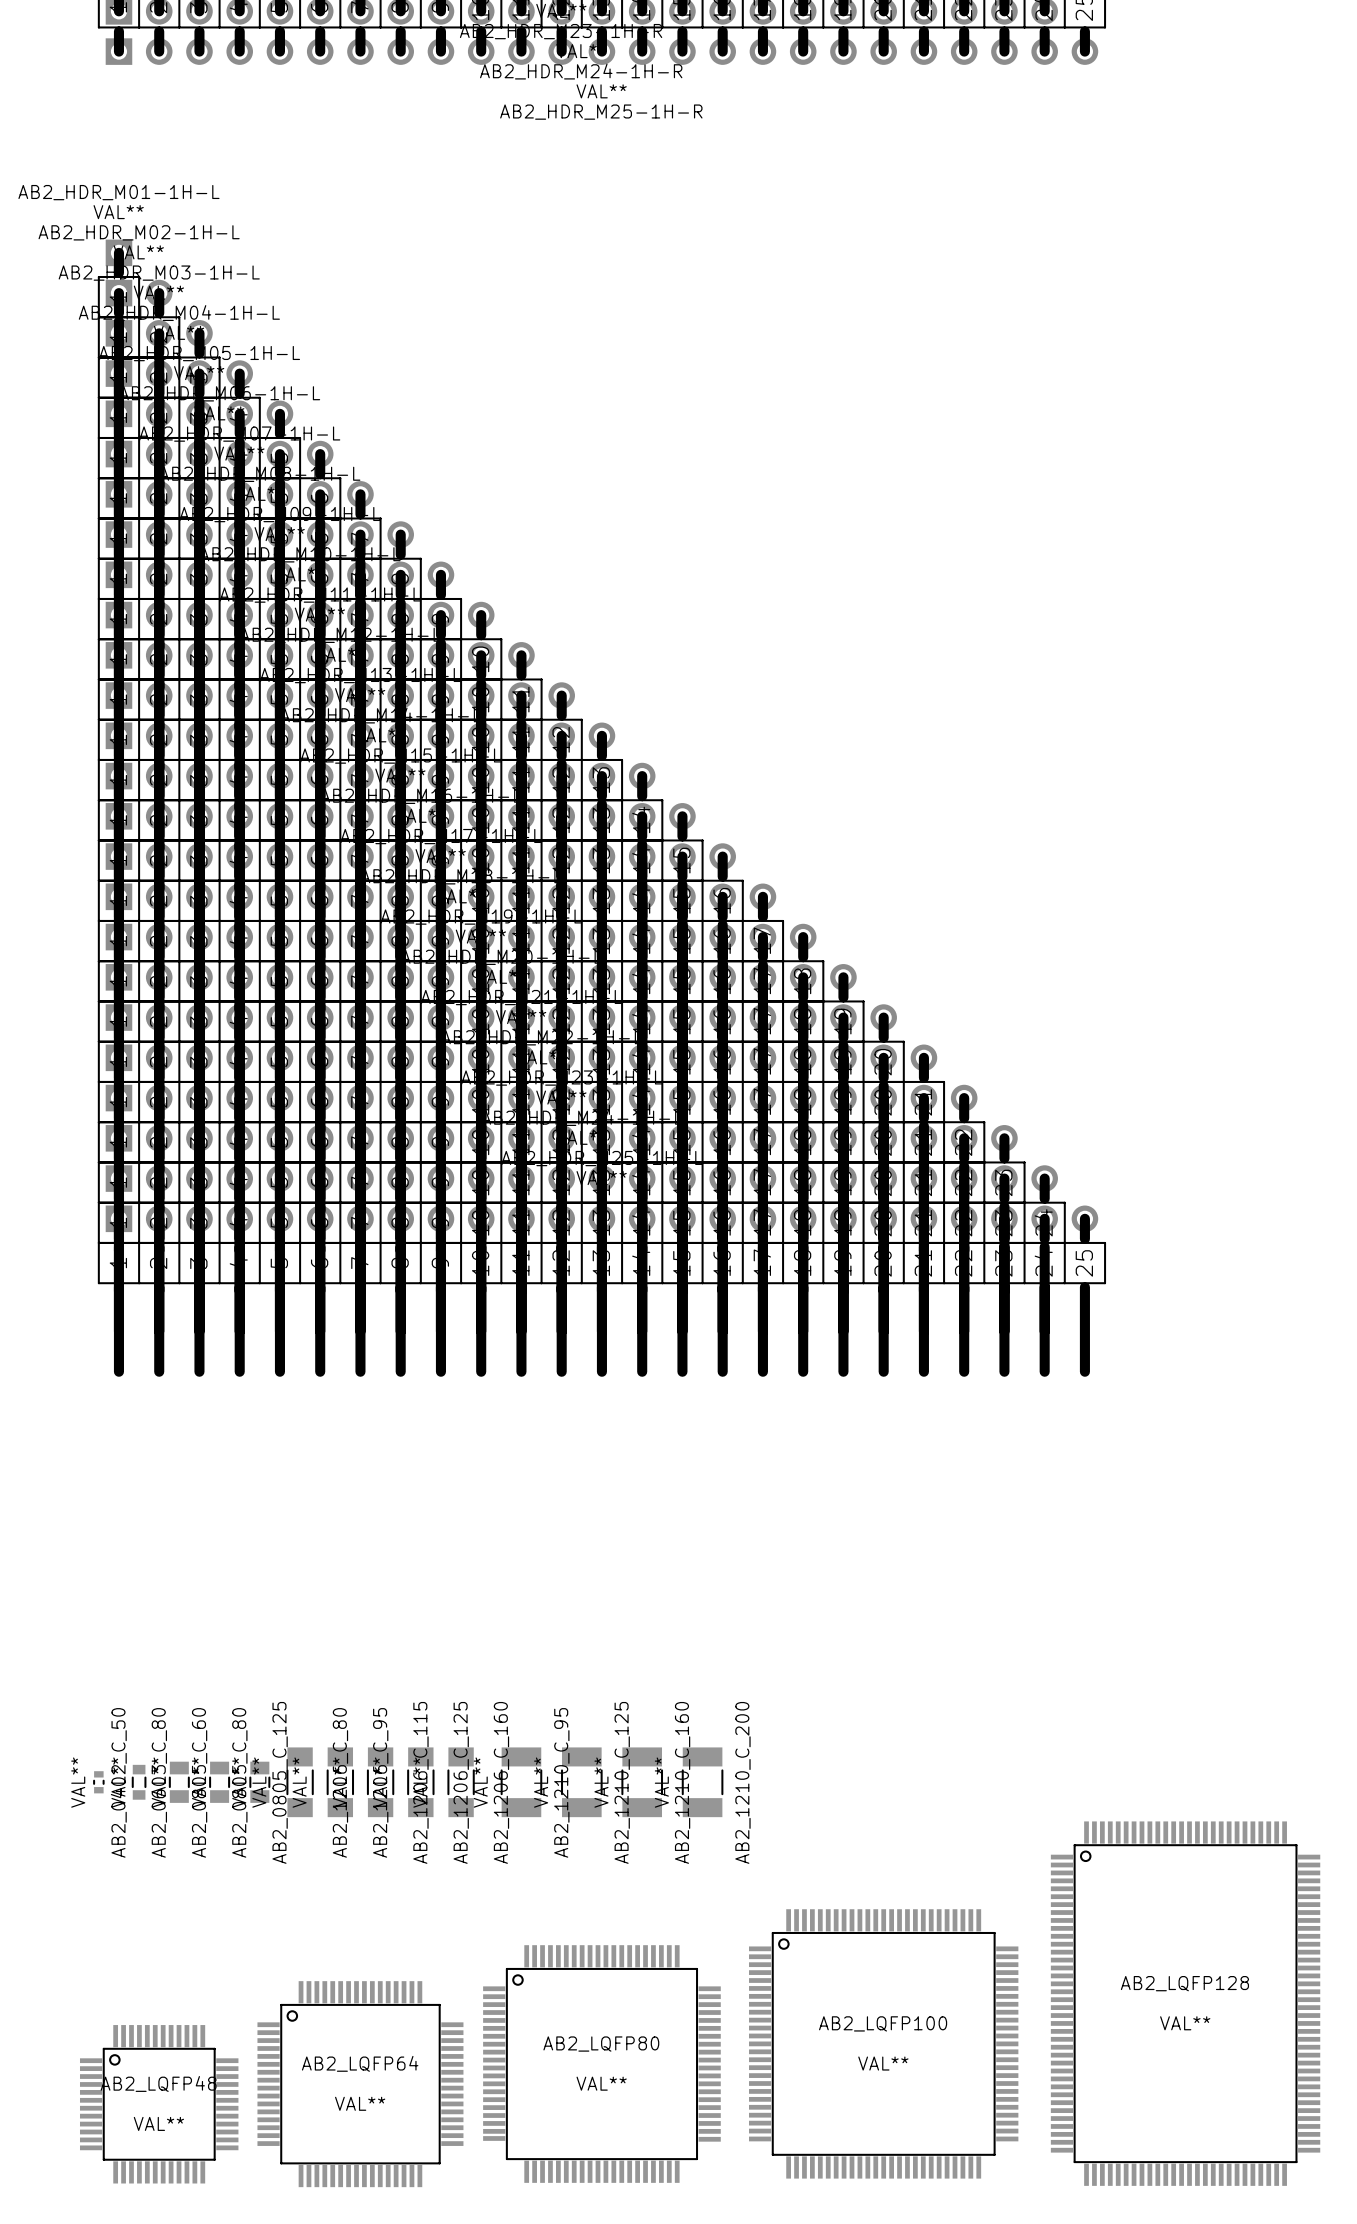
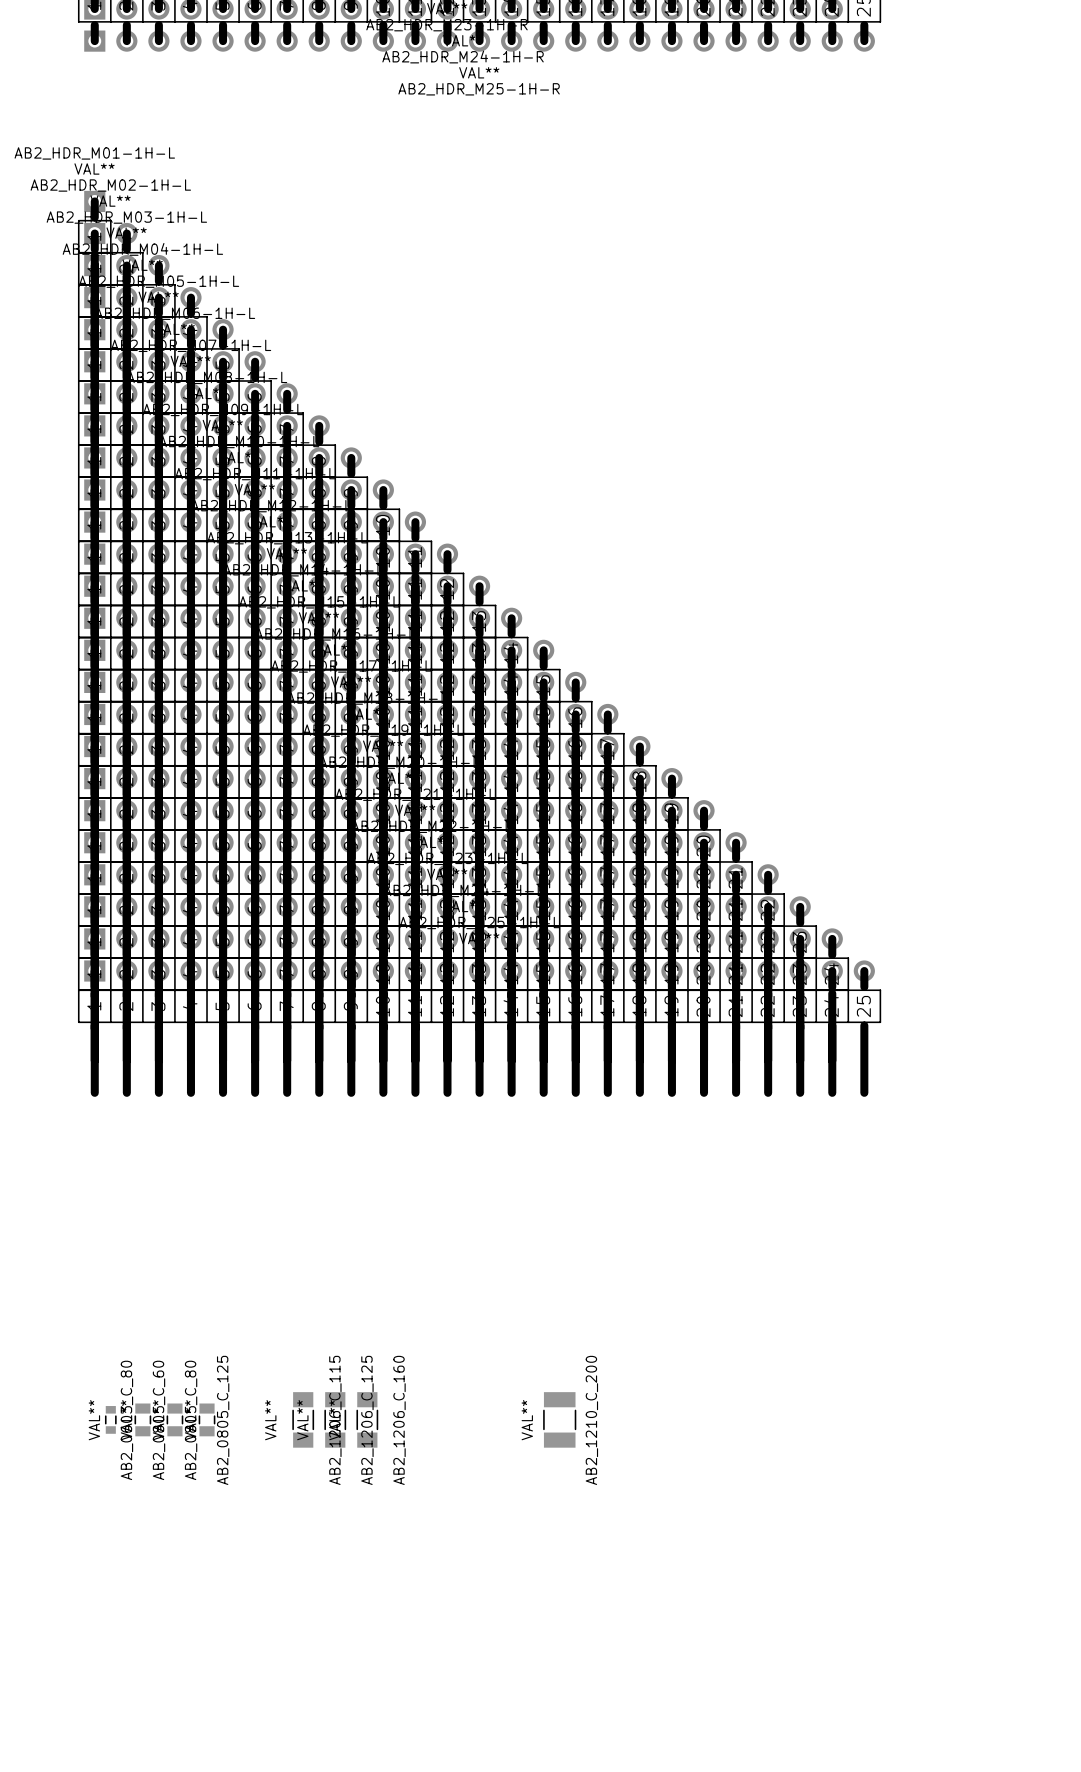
AB2_0402_C_50: VAL** (98, 1782) -> none
AB2_1206_C_80: VAL** (300, 1782) -> none
AB2_1206_C_95: VAL** (340, 1782) -> none
AB2_1210_C_95: VAL** (521, 1782) -> none
AB2_1210_C_125: VAL** (581, 1782) -> none
AB2_1210_C_160: VAL** (642, 1782) -> none
AB2_LQFP128: VAL** (1185, 2003) -> none
AB2_LQFP100: VAL** (883, 2043) -> none
AB2_LQFP80: VAL** (601, 2064) -> none
AB2_LQFP64: VAL** (360, 2084) -> none
AB2_LQFP48: VAL** (159, 2104) -> none

